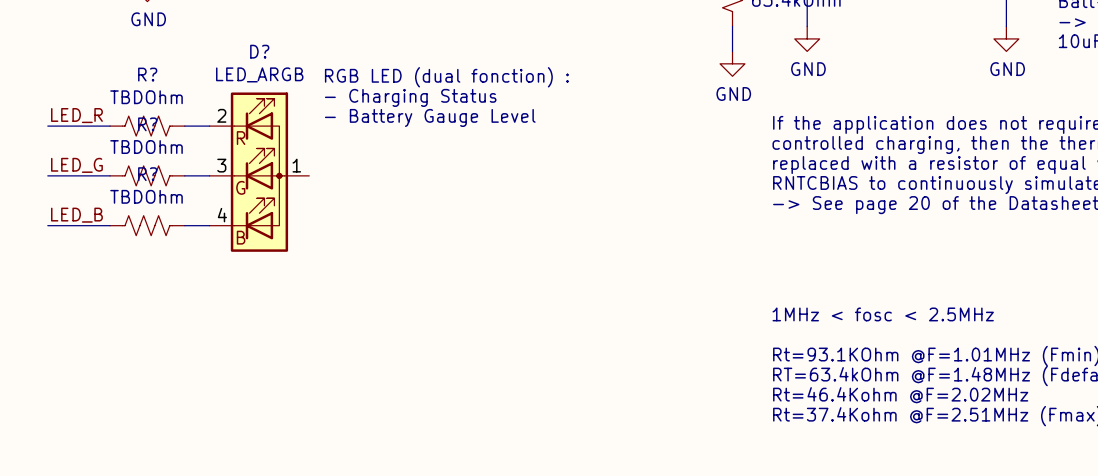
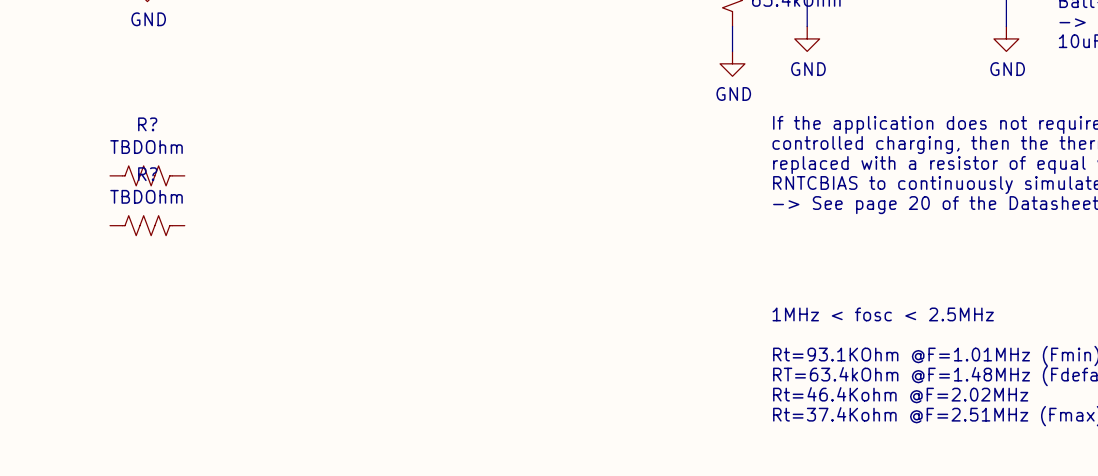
text: RGB LED (dual fonction) : (446, 77) -> none
text: - Charging Status (410, 97) -> none
label: LED_R (76, 115) -> none
text: - Battery Gauge Level (430, 117) -> none
wire: (47, 126) (110, 126) -> none
R?: TBDOhm (147, 126) -> none
wire: (184, 126) (209, 126) -> none
label: LED_G (76, 165) -> none
D?: LED_ARGB (259, 172) -> none
wire: (47, 175) (110, 175) -> none
wire: (184, 175) (209, 175) -> none
label: LED_B (76, 215) -> none
wire: (47, 225) (110, 225) -> none
wire: (184, 225) (209, 225) -> none

